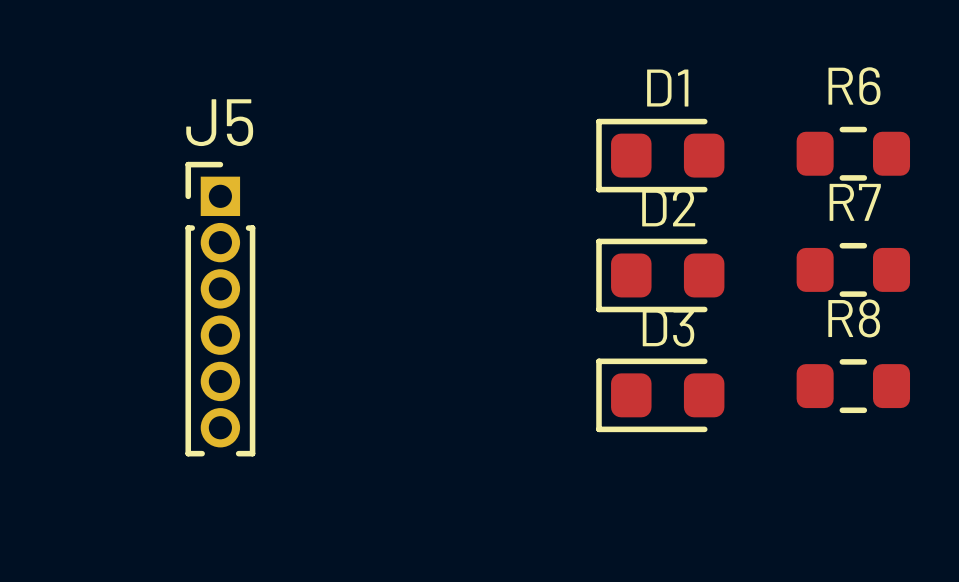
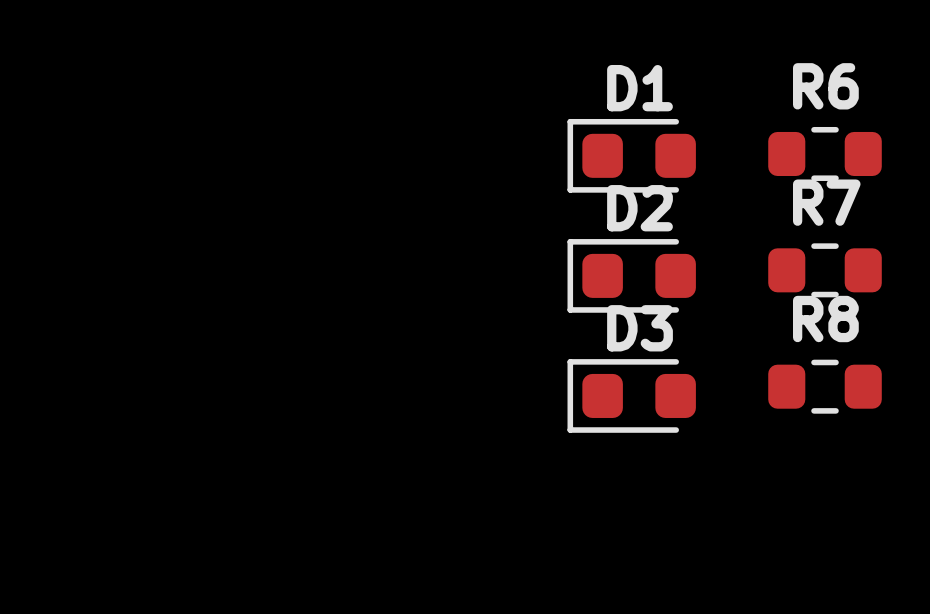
J5: (220, 309) -> none

